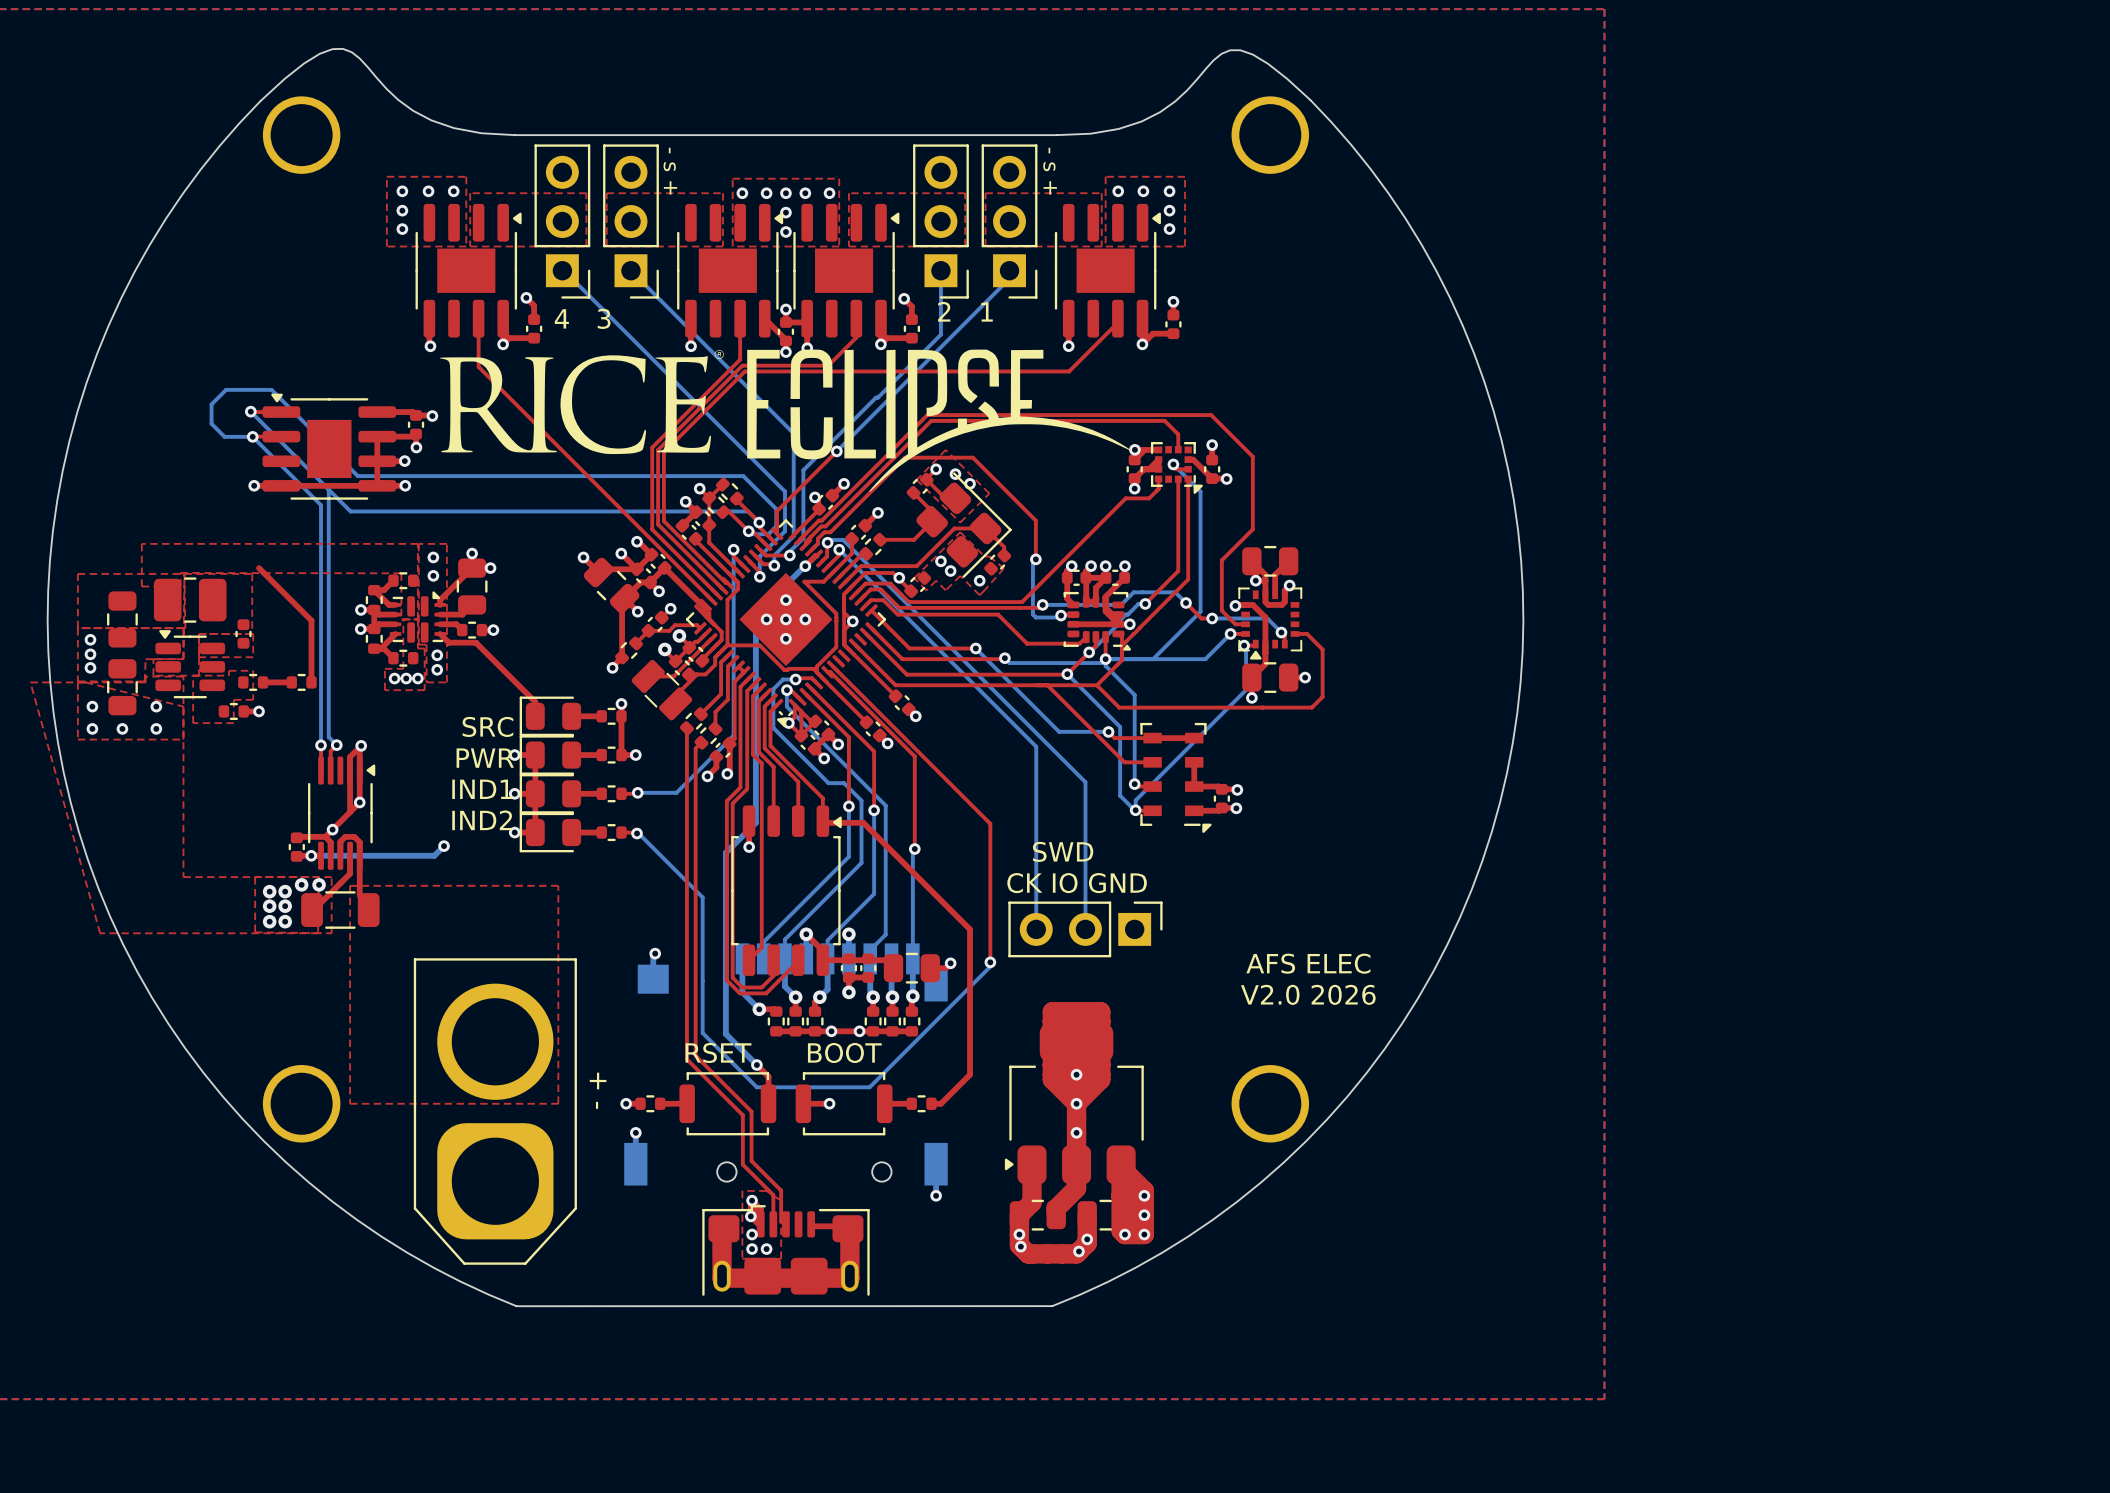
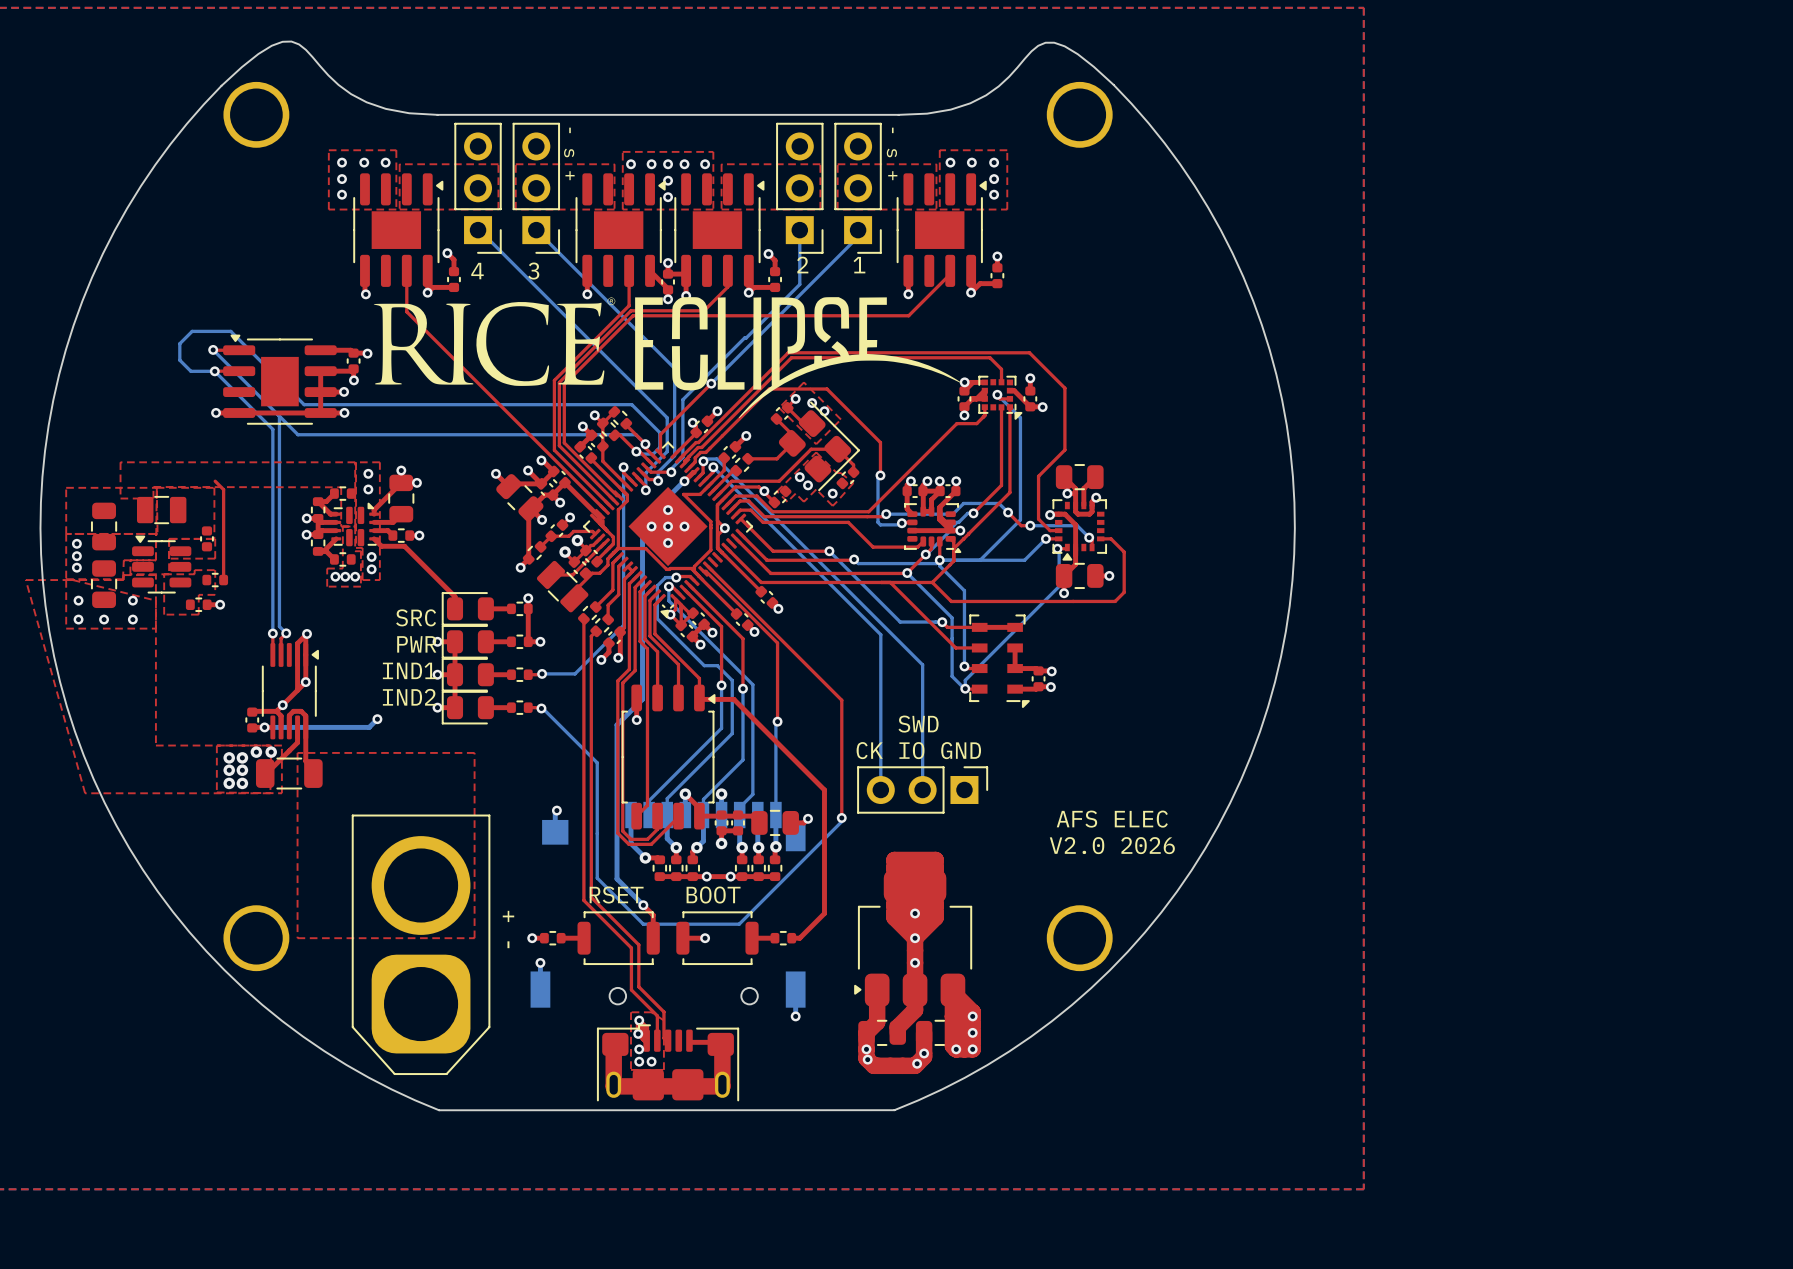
top track: (259, 568) (311, 620) (311, 682) -> none
part footprint: [153, 577, 227, 623] -> [137, 496, 187, 525]
top track: (263, 682) (285, 682) -> (223, 580) (223, 489) (215, 481)
part: (301, 682) -> none

